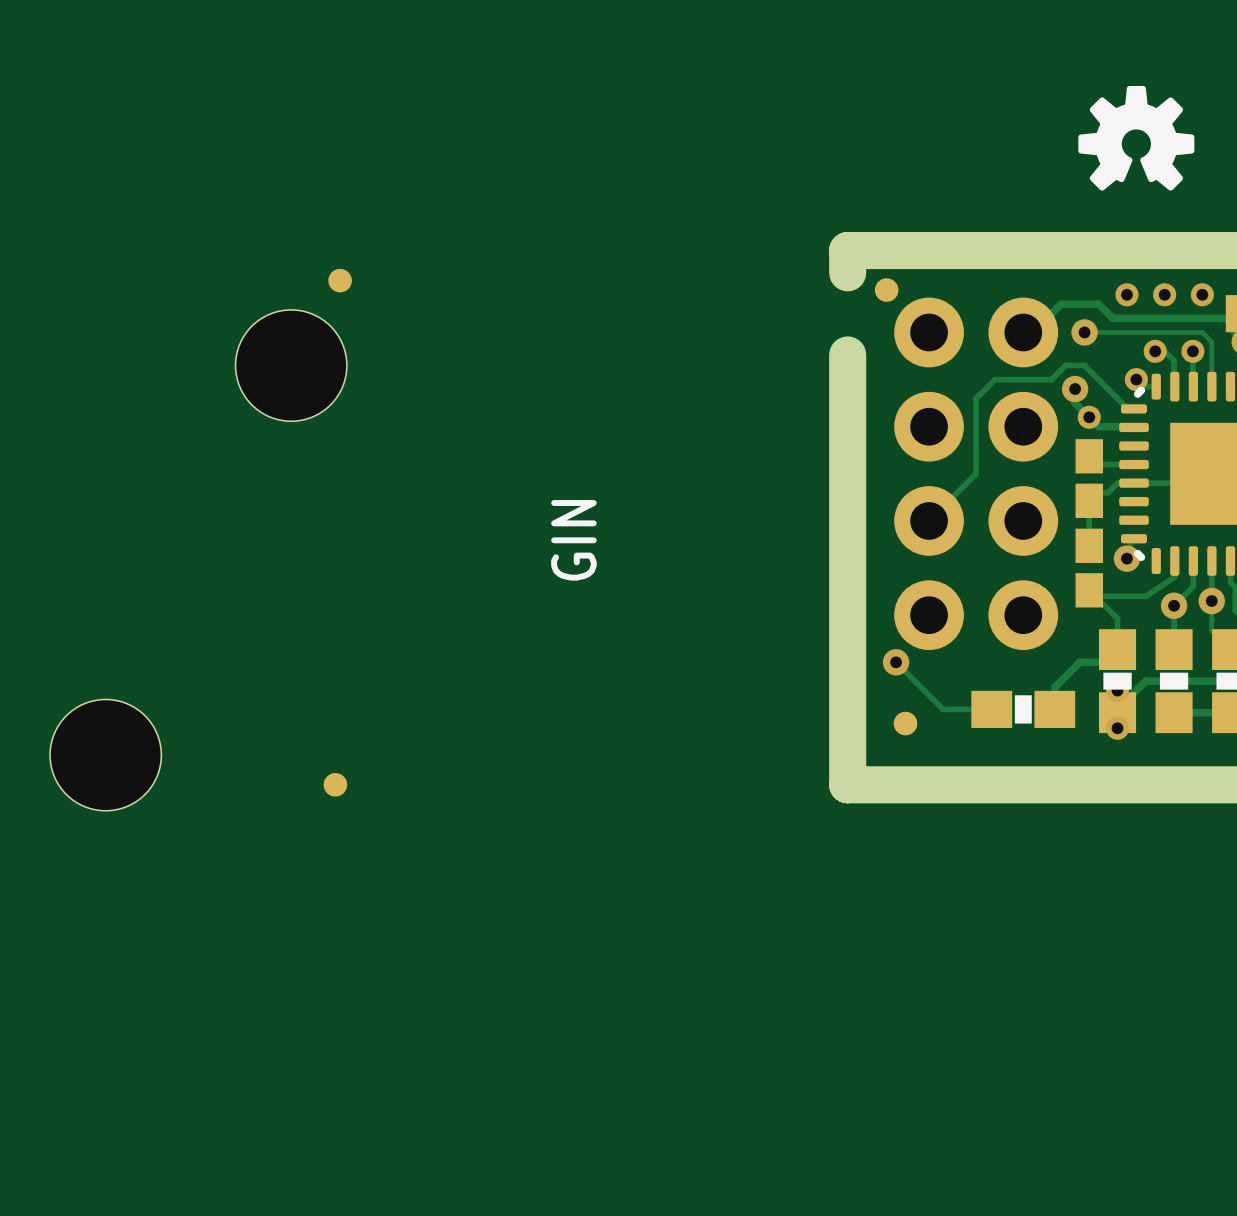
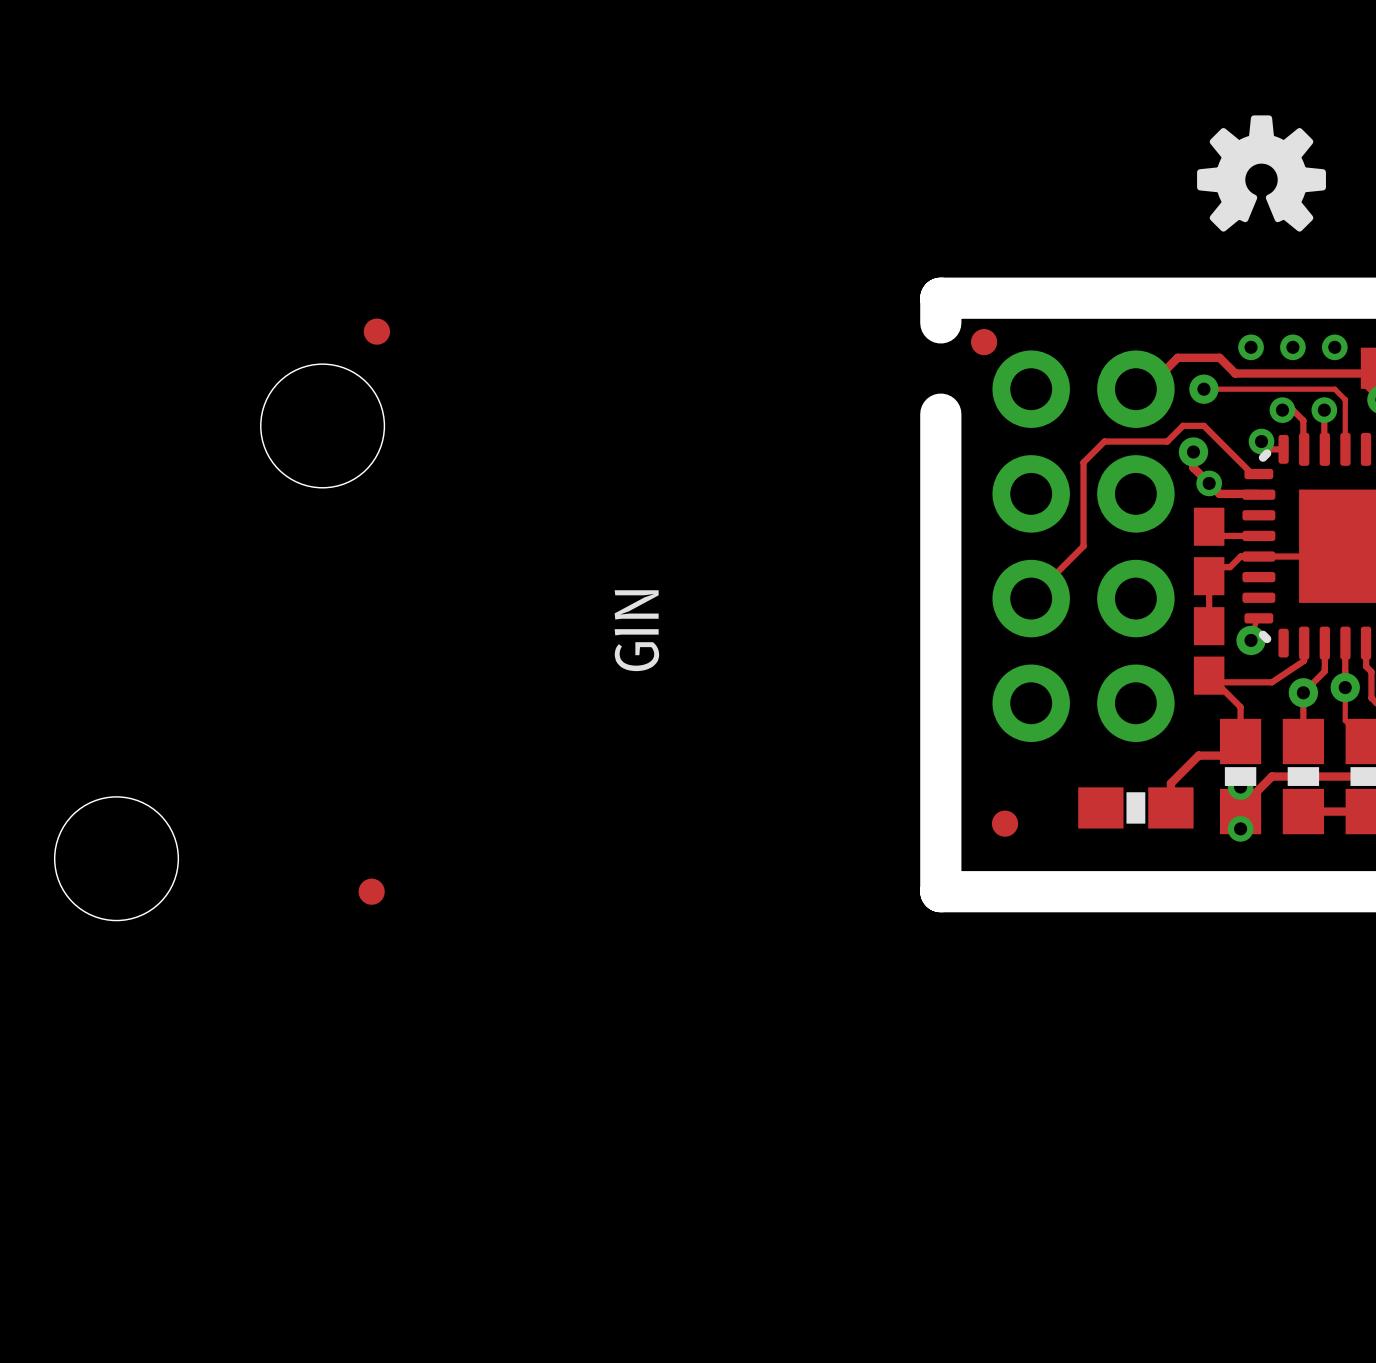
track: (896, 662) (943, 709) (991, 709) -> none
via: (896, 662) -> none

